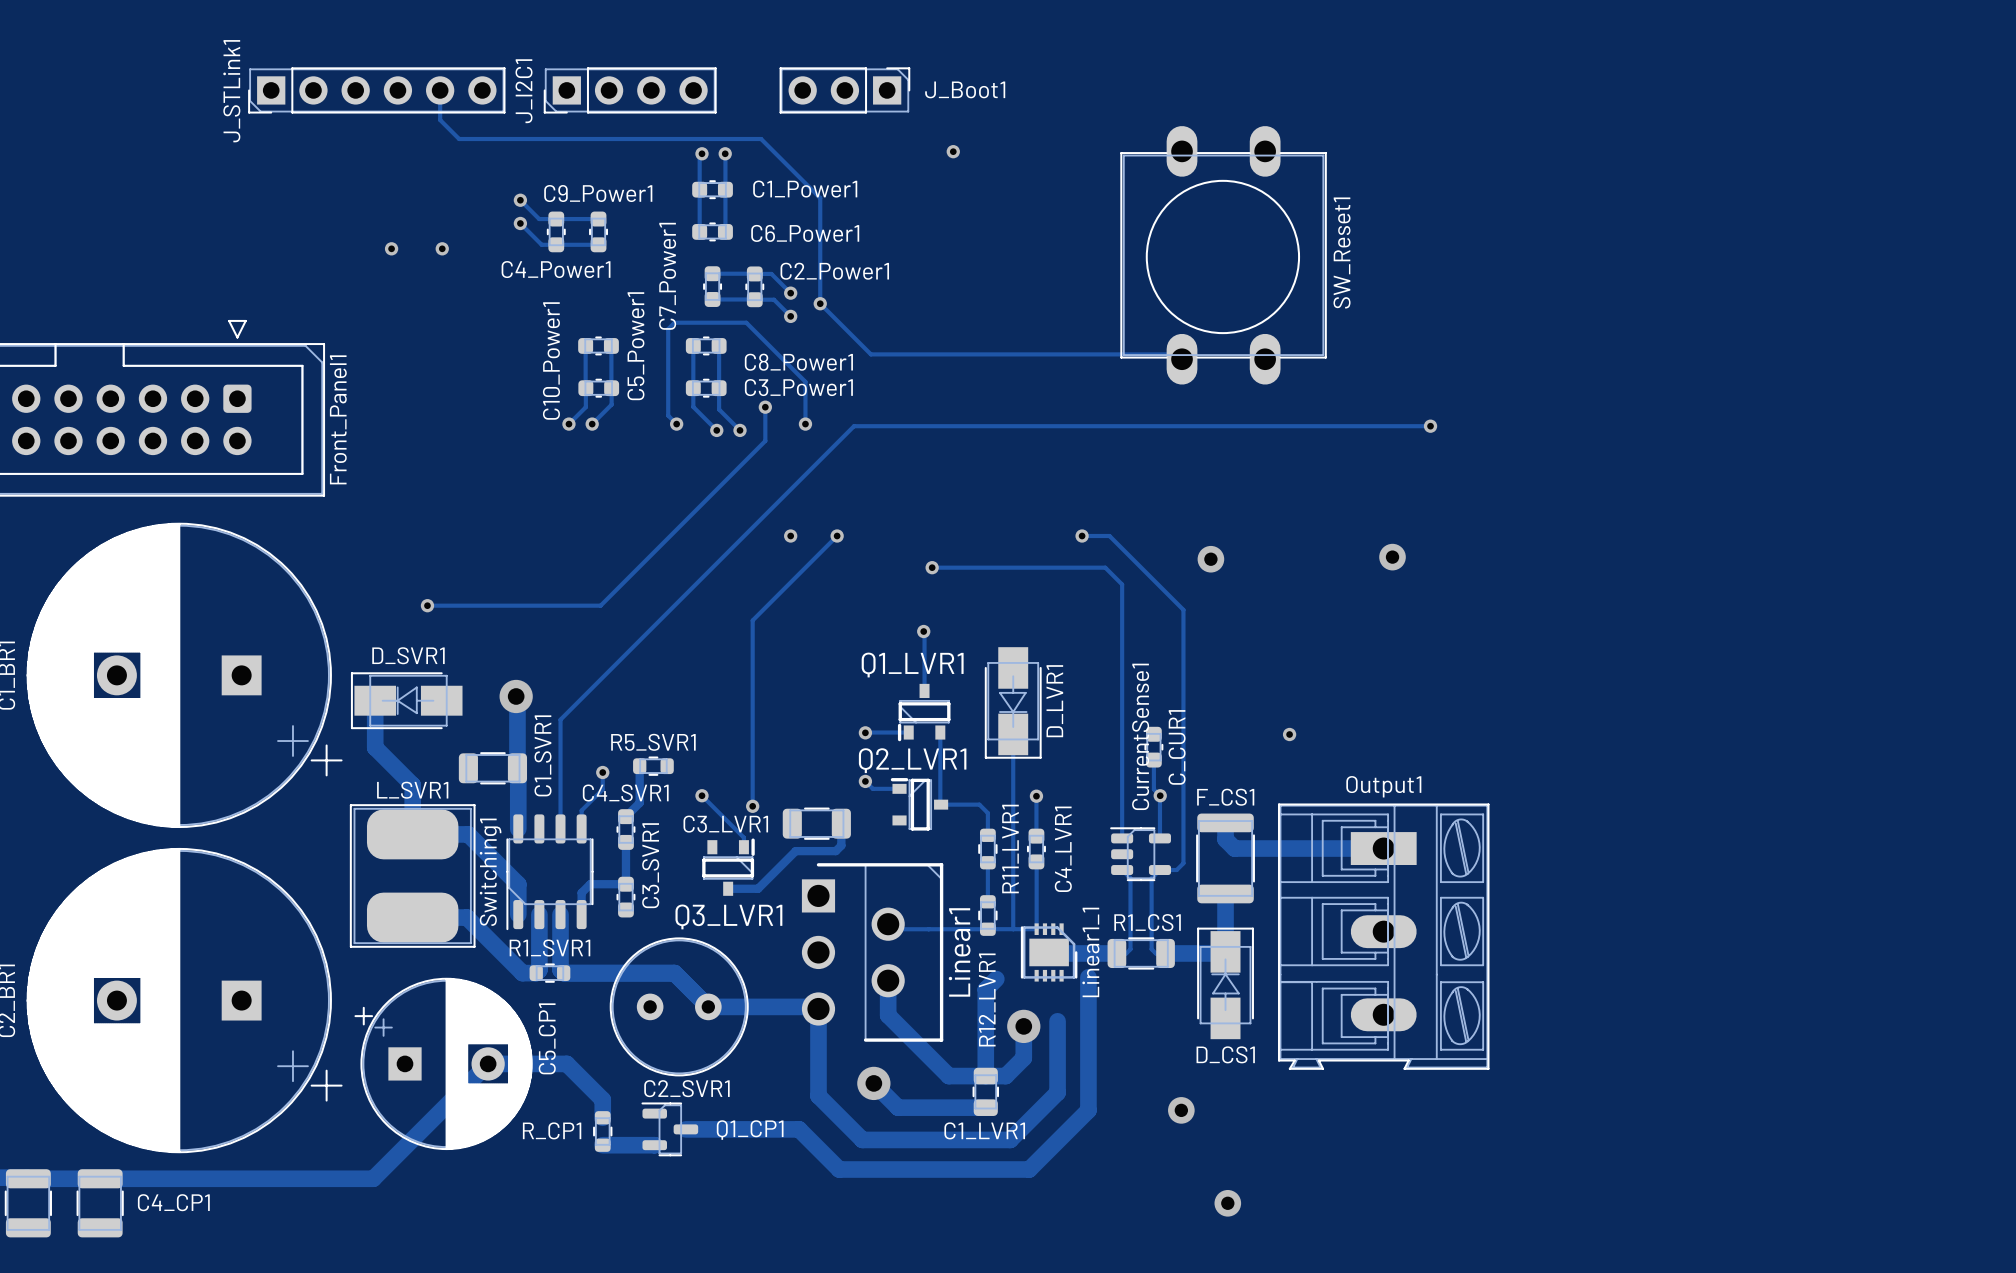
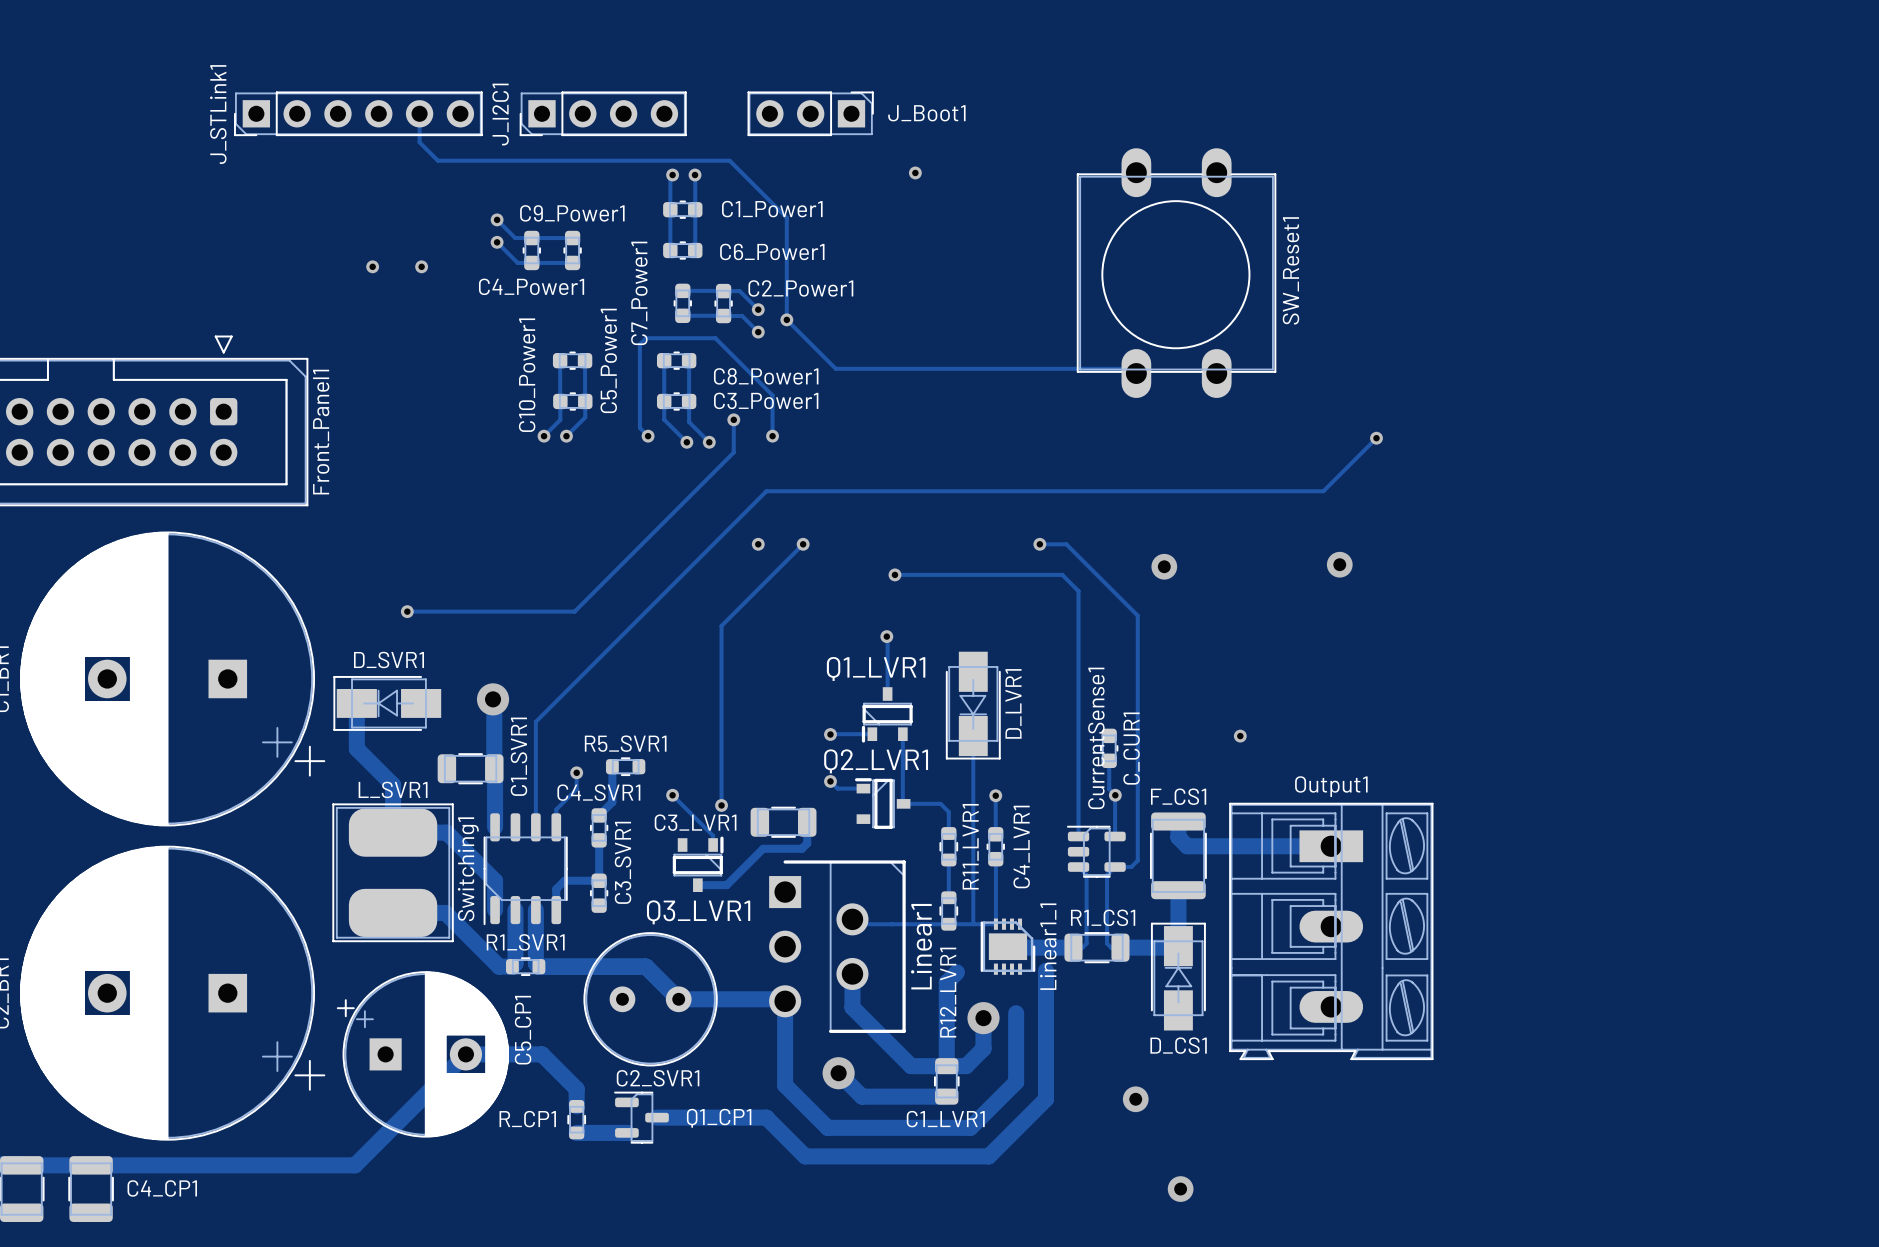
track: (1430, 426) (854, 426) (799, 481) -> (1376, 438) (1323, 491) (766, 491)

